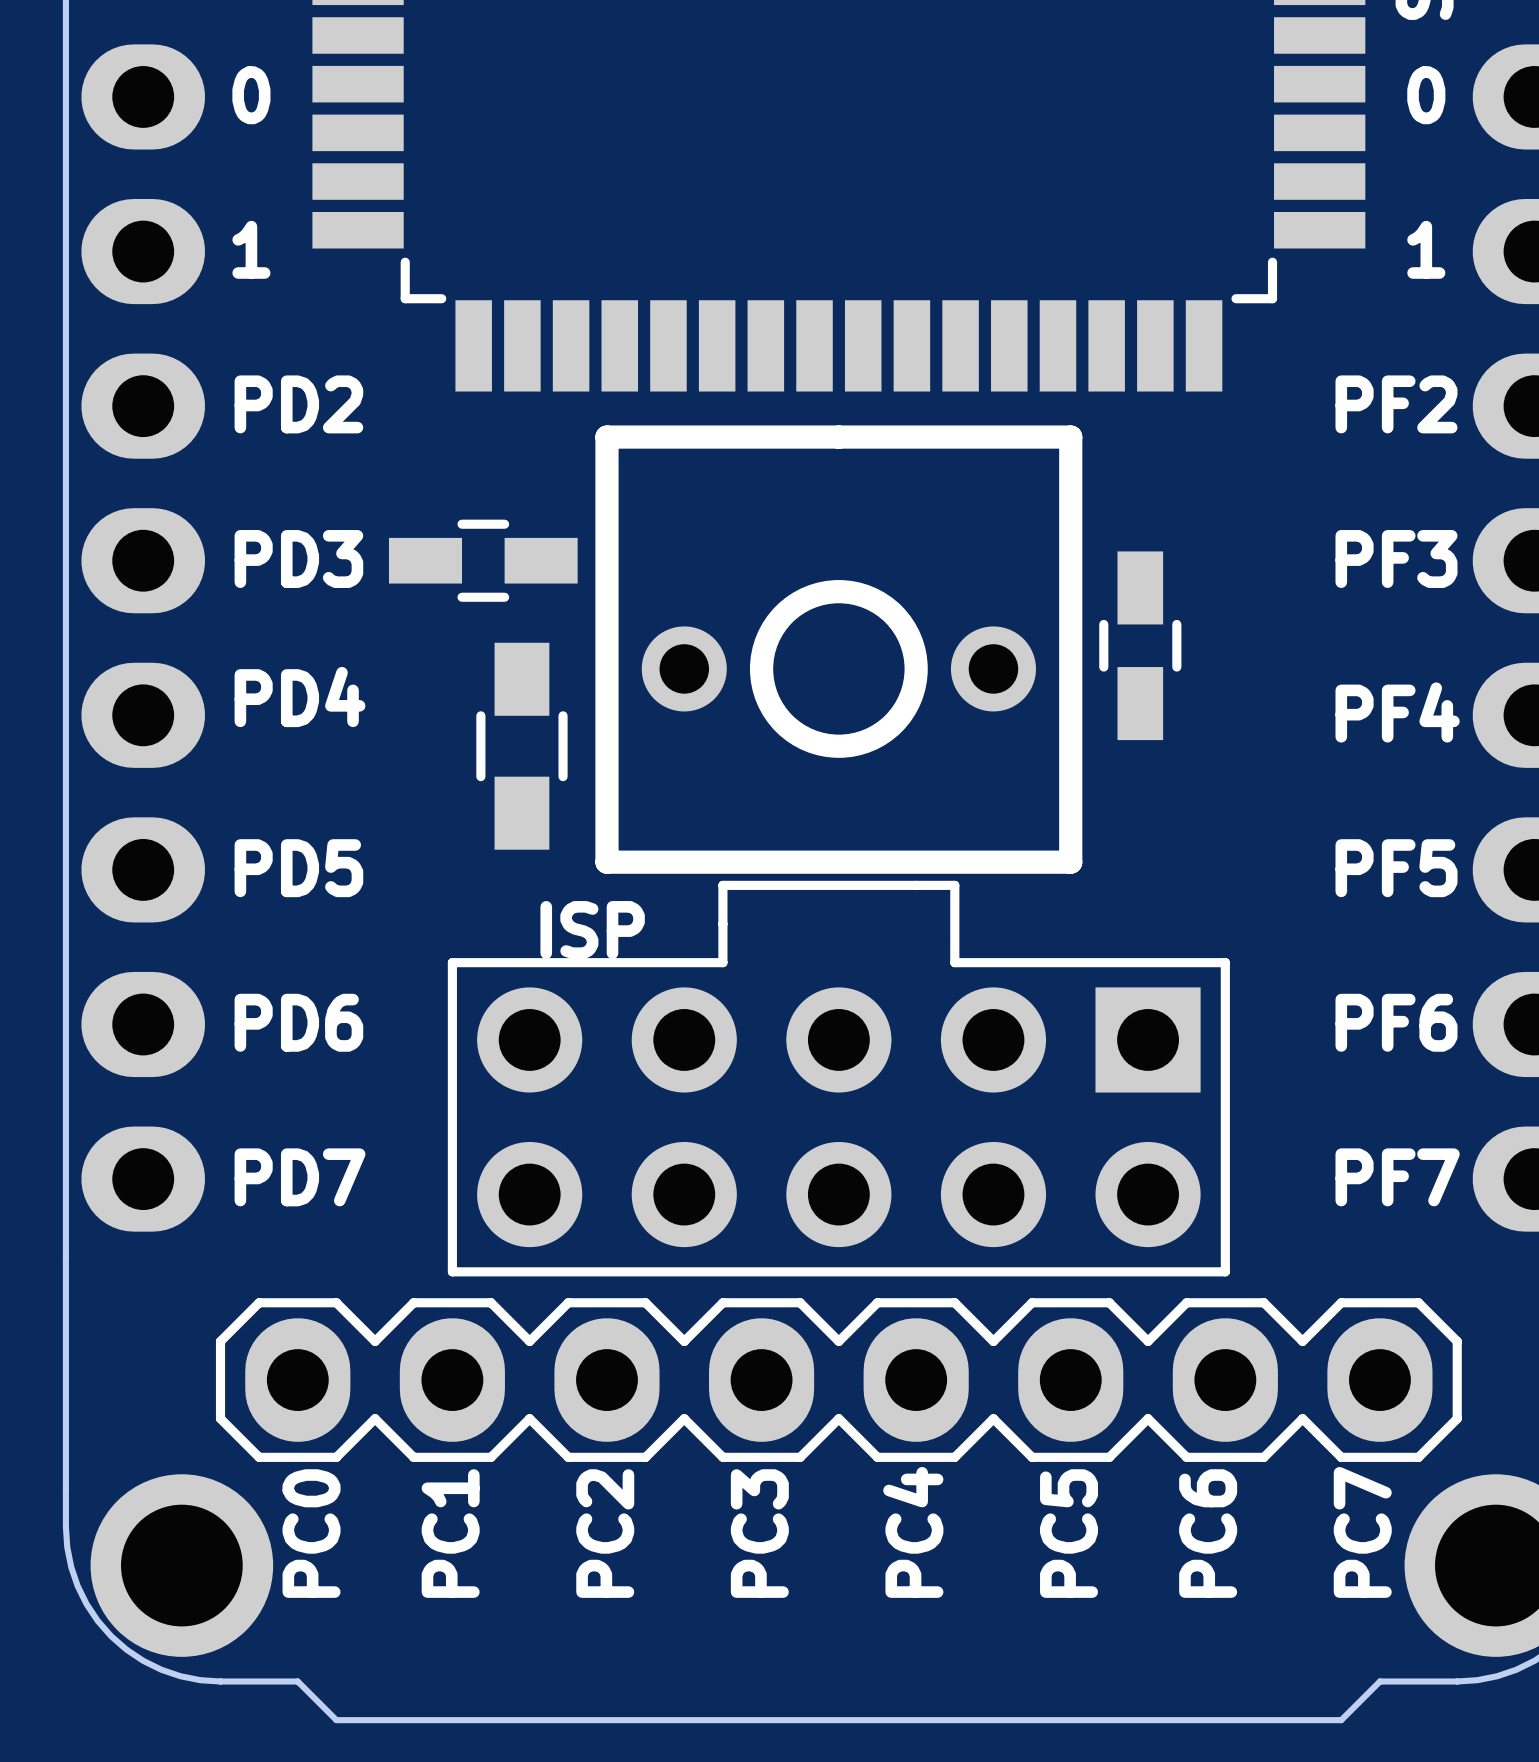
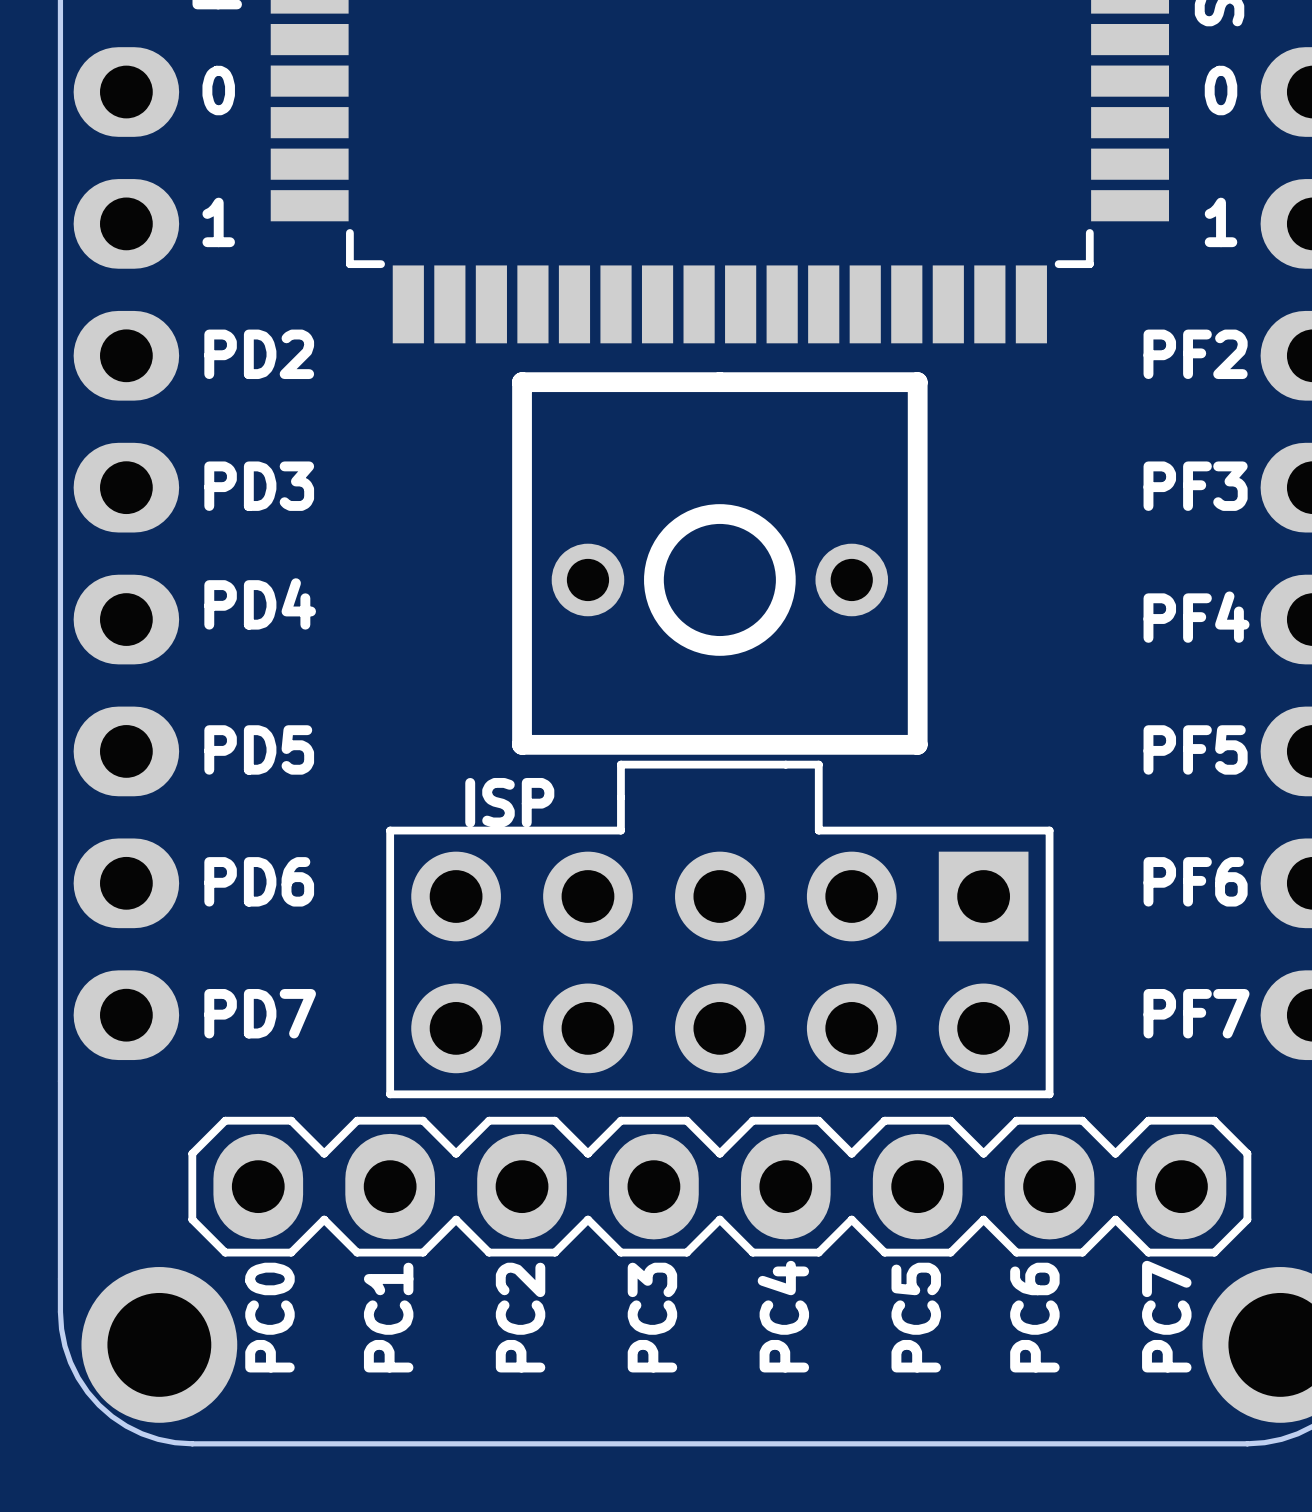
part: (483, 560) -> none
part: (1140, 645) -> none
part: (521, 746) -> none
board edge: (297, 1681) (336, 1720) (1341, 1720) (1379, 1681) -> (258, 1443) (1181, 1443)

